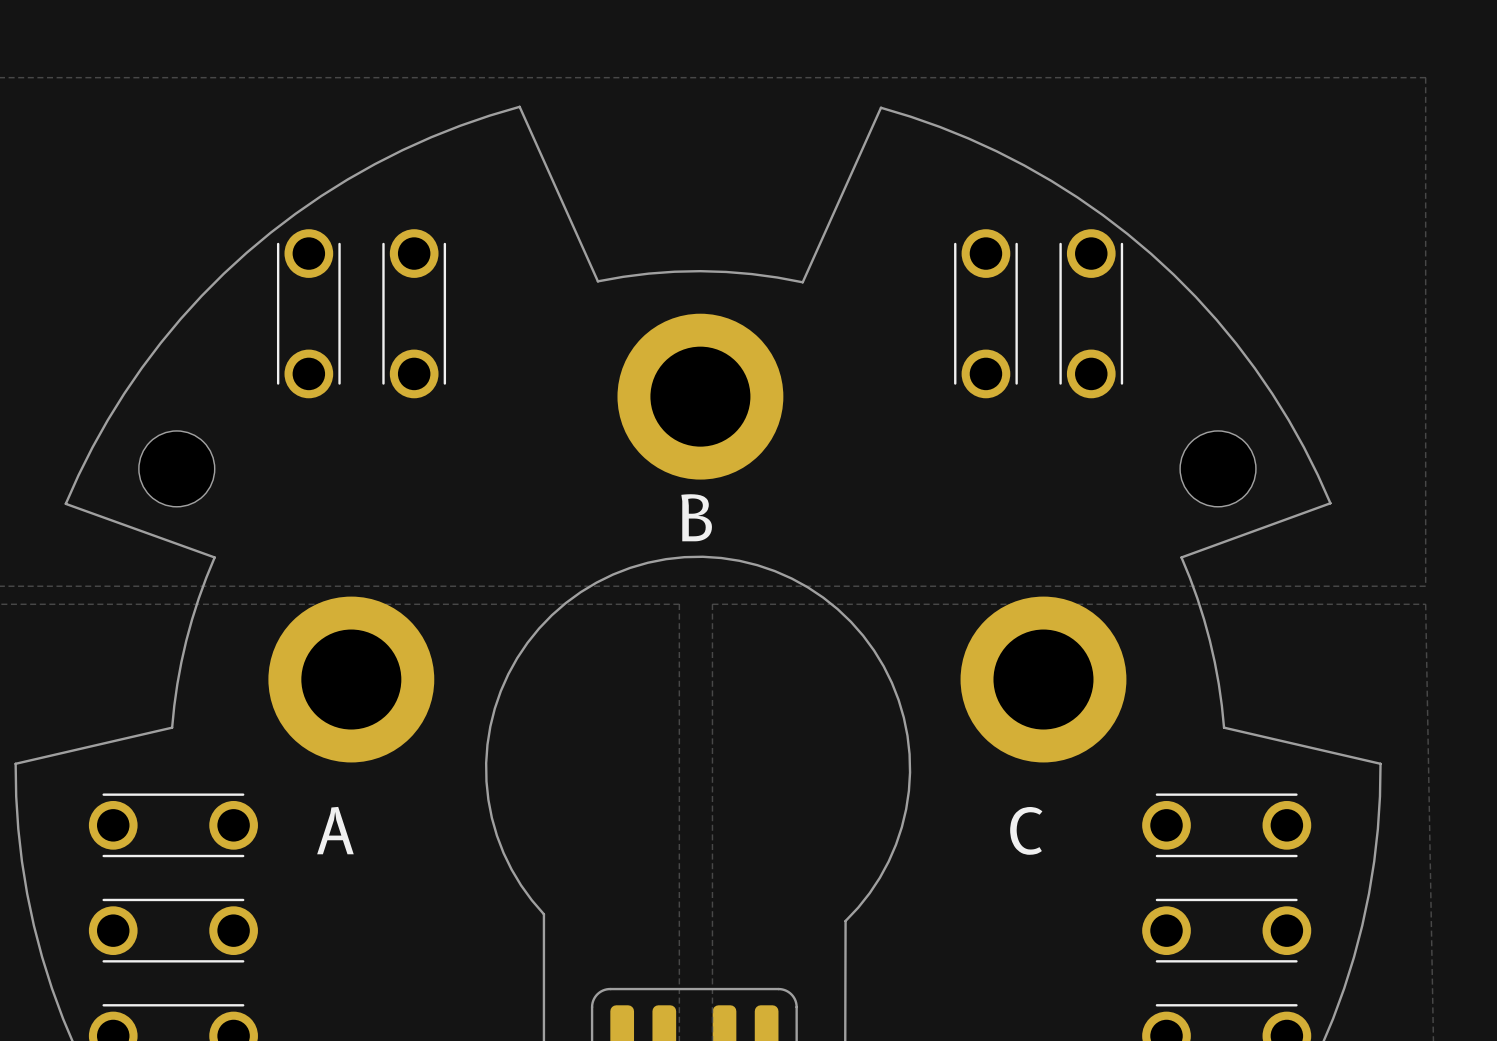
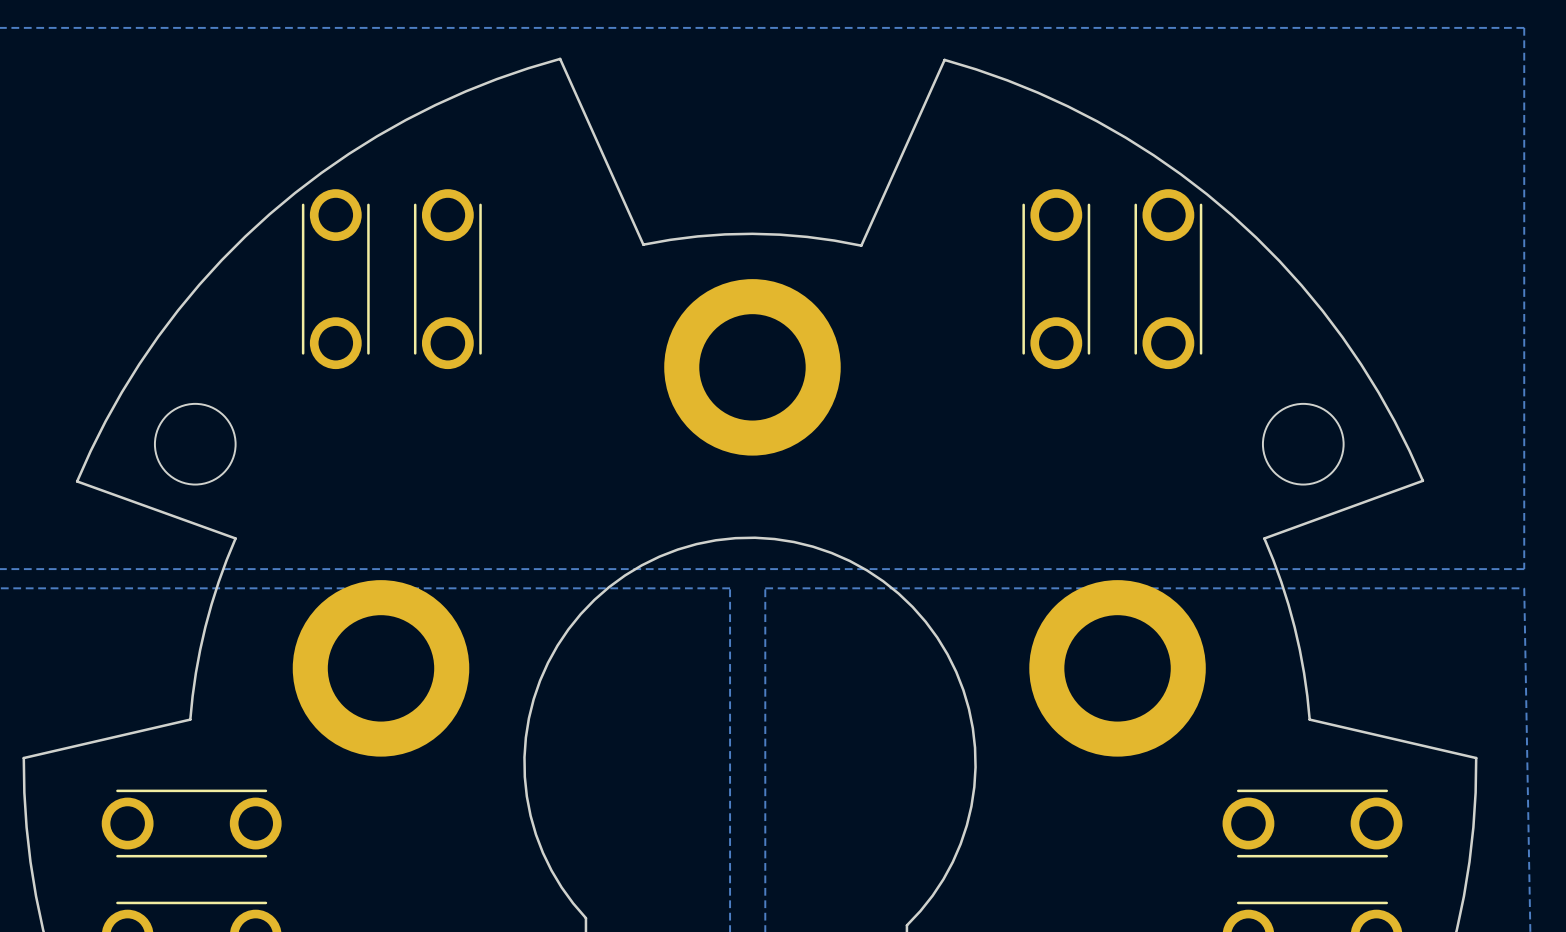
text: B (696, 517) -> none
text: A (335, 830) -> none
text: C (1026, 830) -> none

